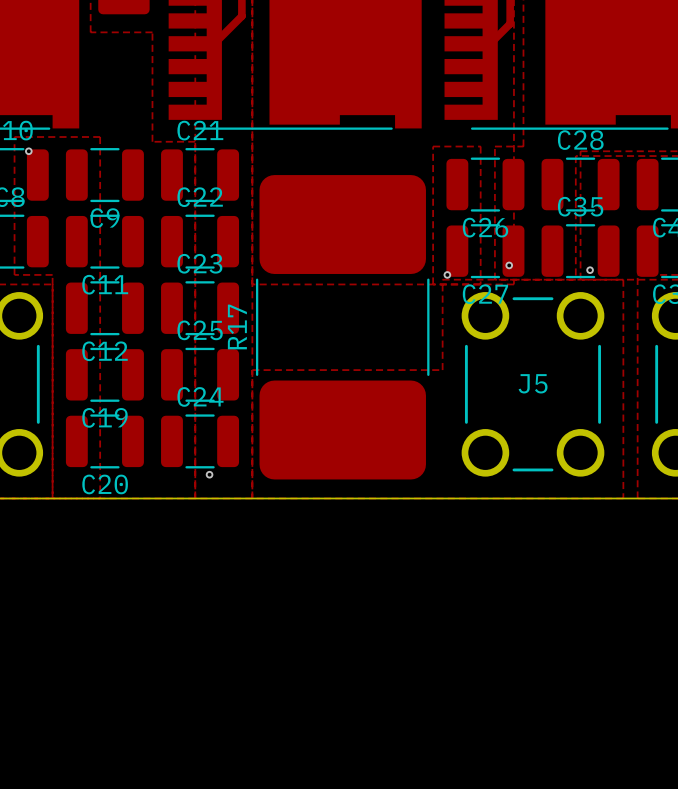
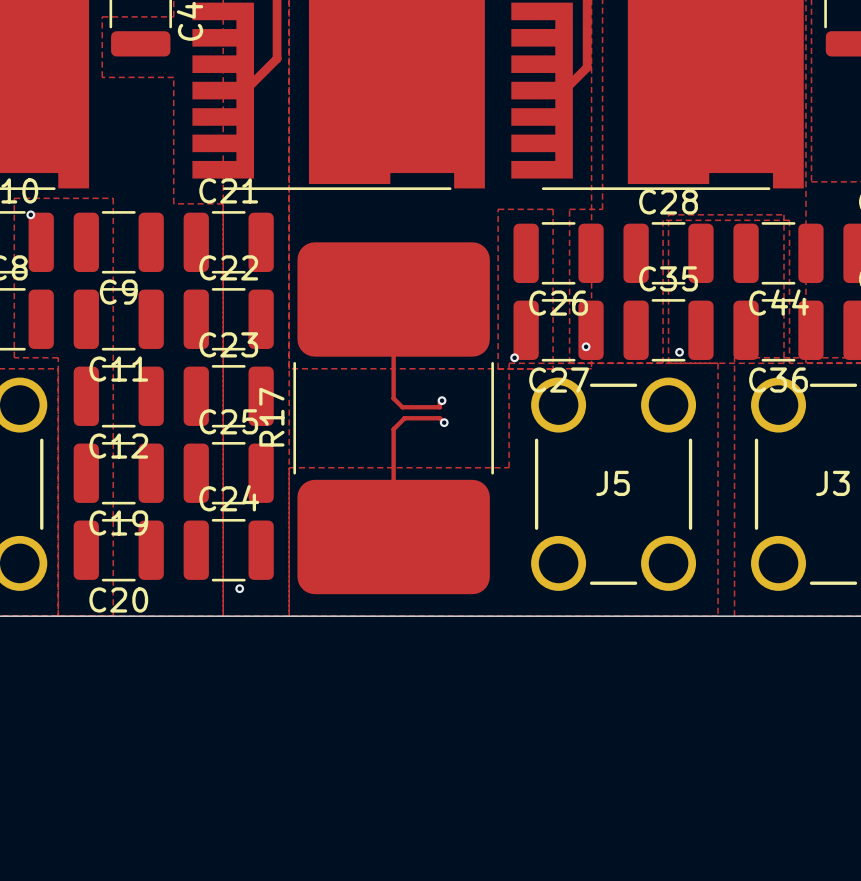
track: none -> (393, 299) (393, 398) (402, 407) (439, 407) (442, 400)
via: none -> (442, 400)
track: none -> (444, 422) (439, 418) (404, 418) (393, 429) (393, 537)
via: none -> (444, 422)

